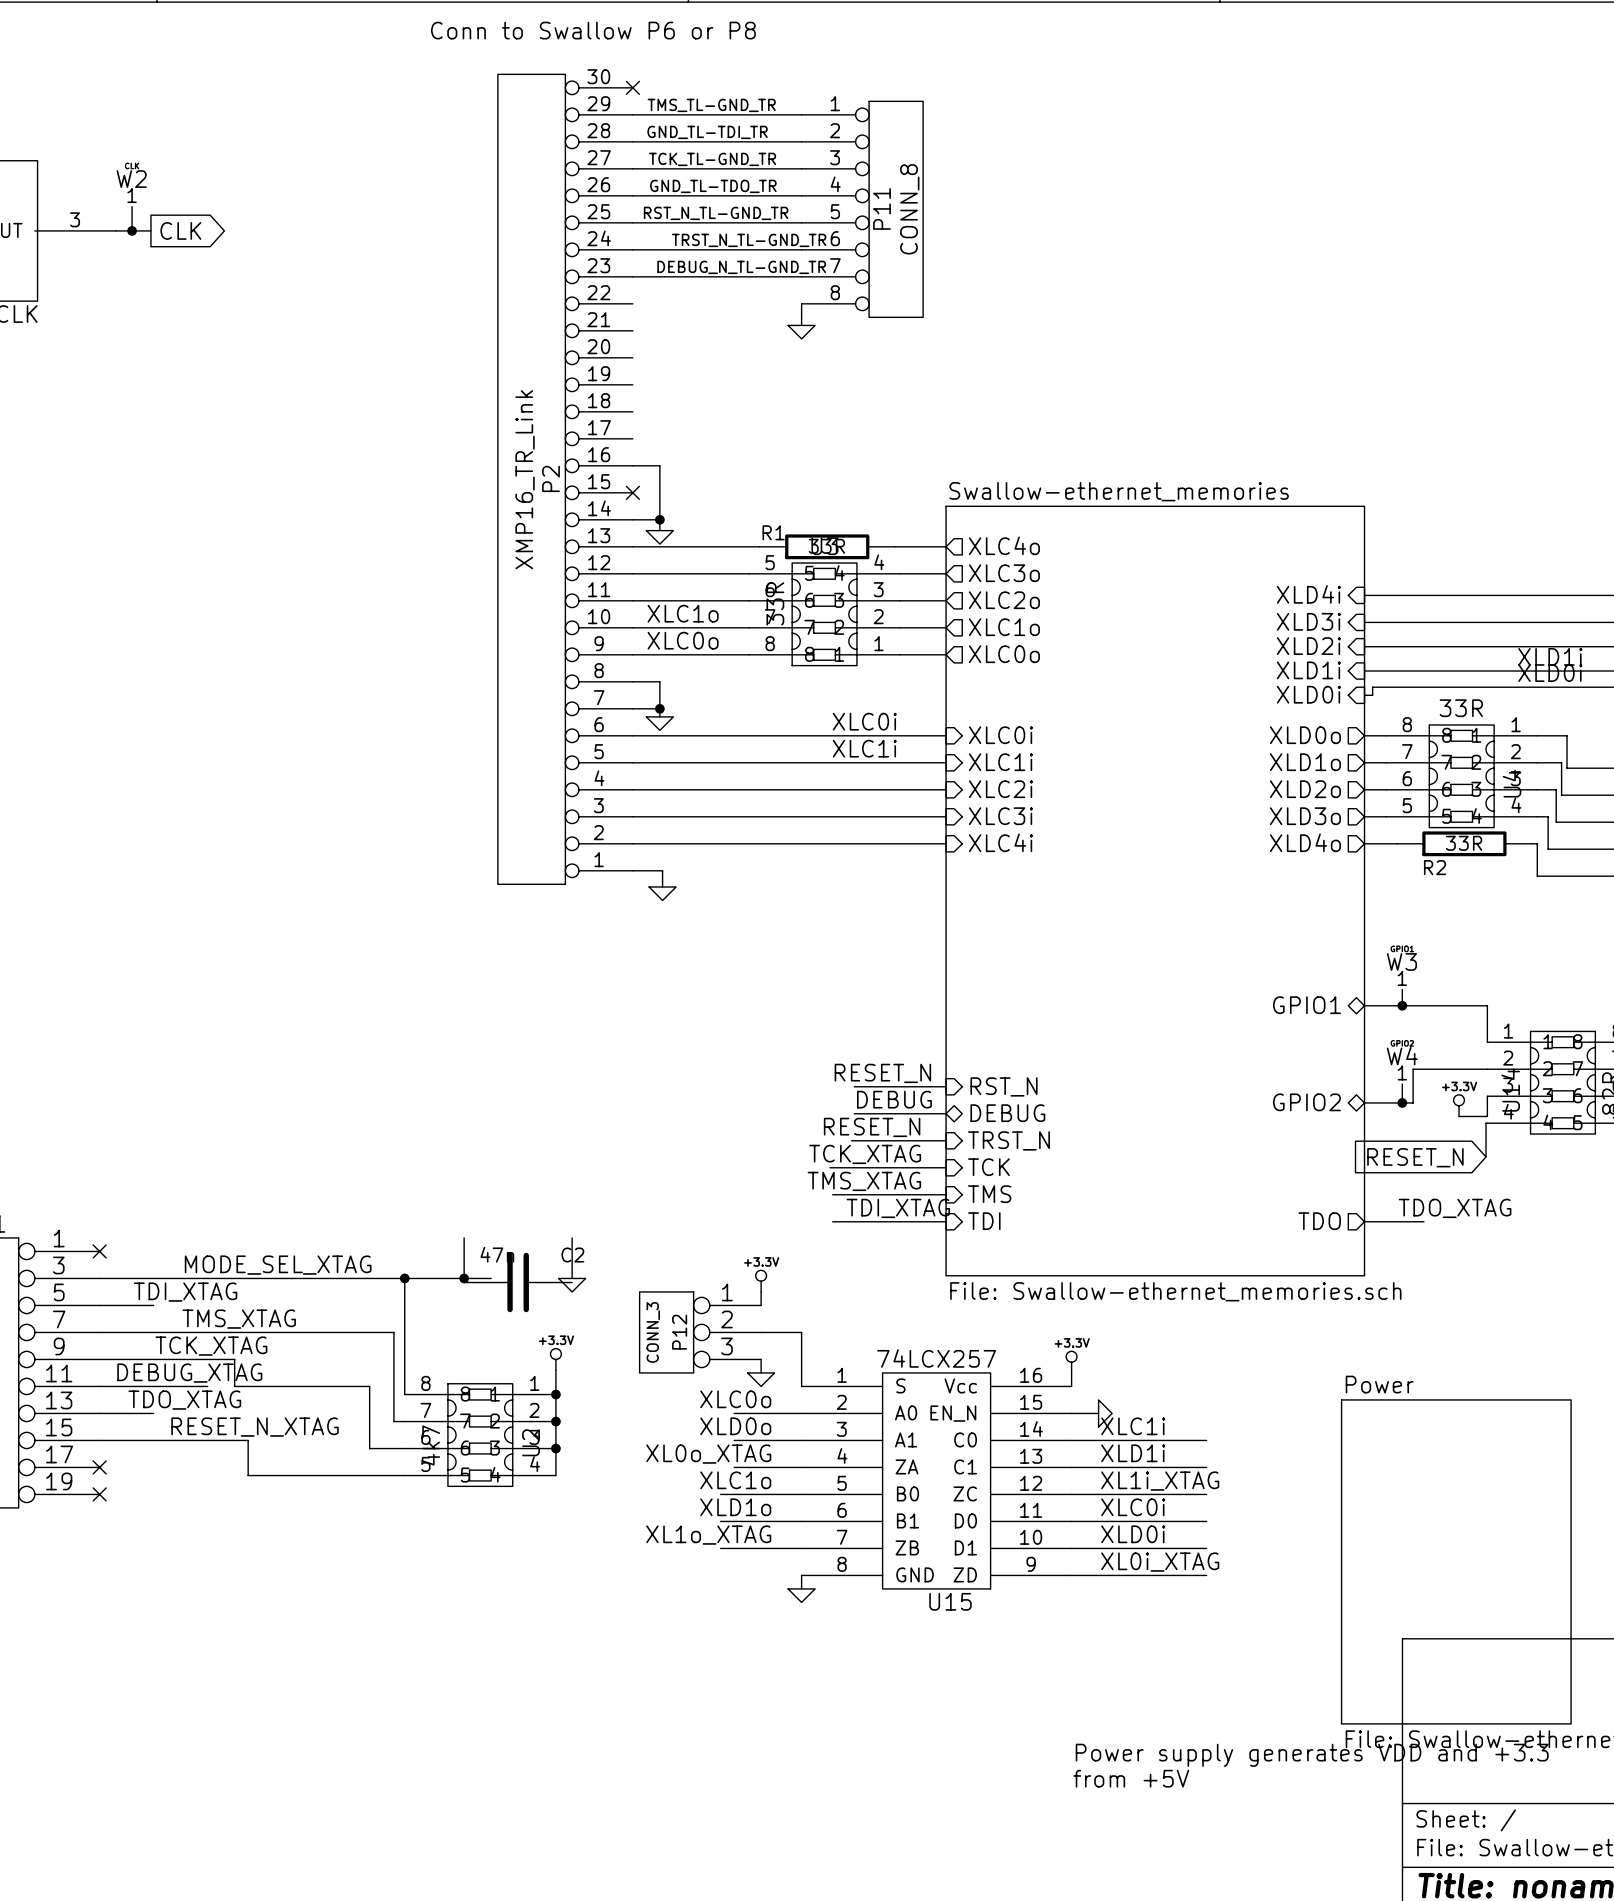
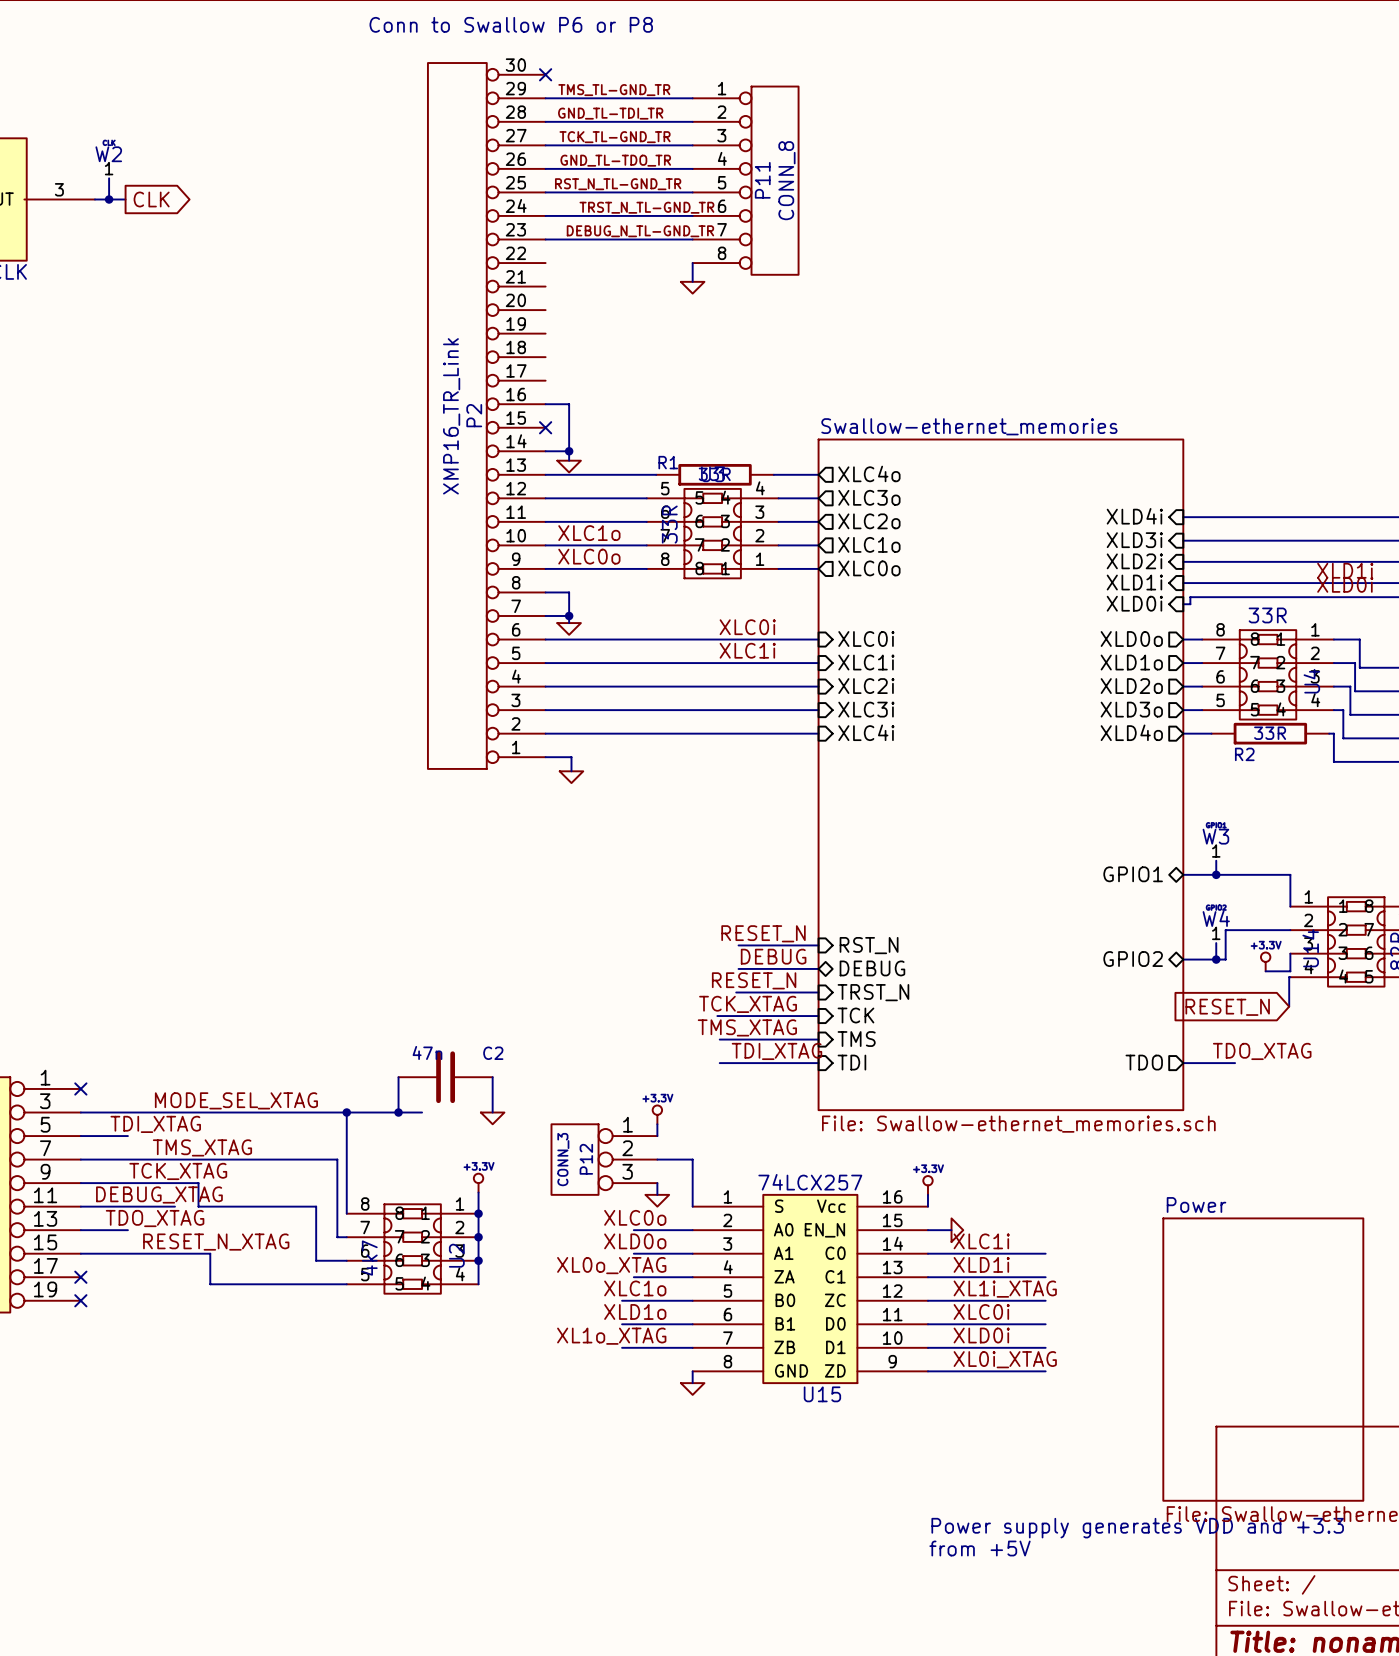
C2 position: (518, 1282) -> (445, 1077)

